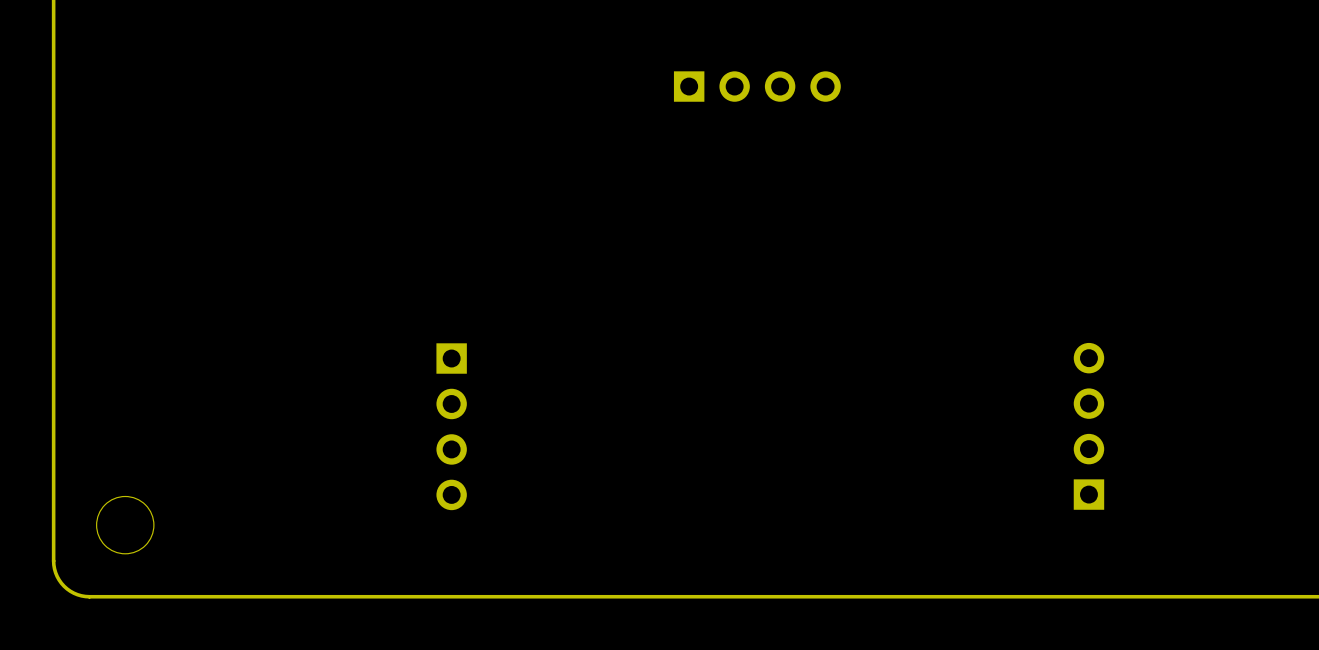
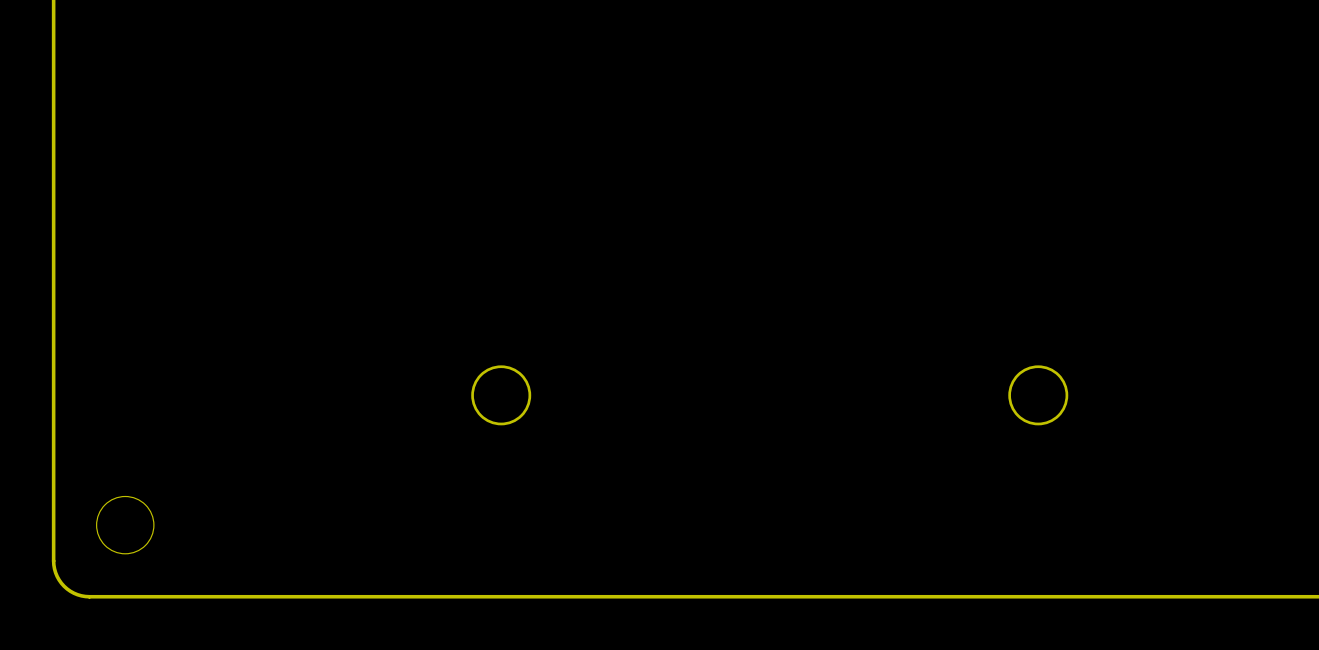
part: (757, 86) -> none
round board edge: none -> [471, 365, 532, 426]
round board edge: none -> [1008, 365, 1069, 426]
part: (451, 426) -> none
part: (1088, 426) -> none

